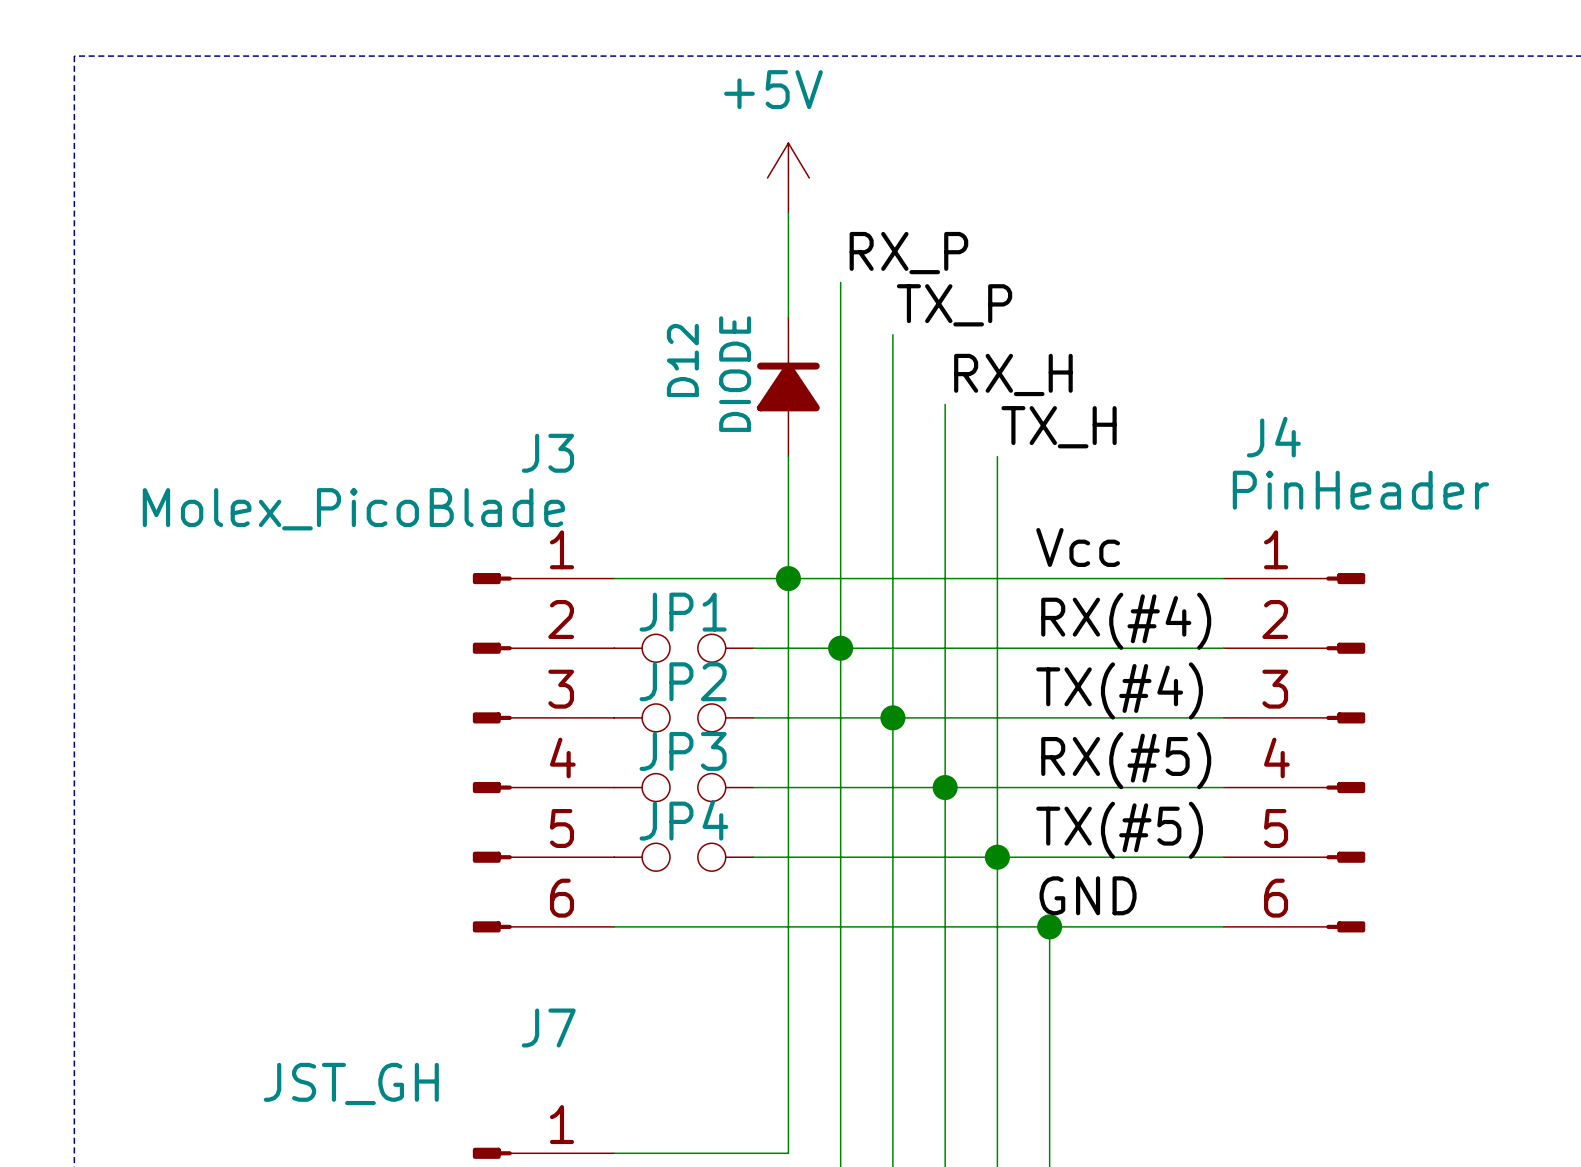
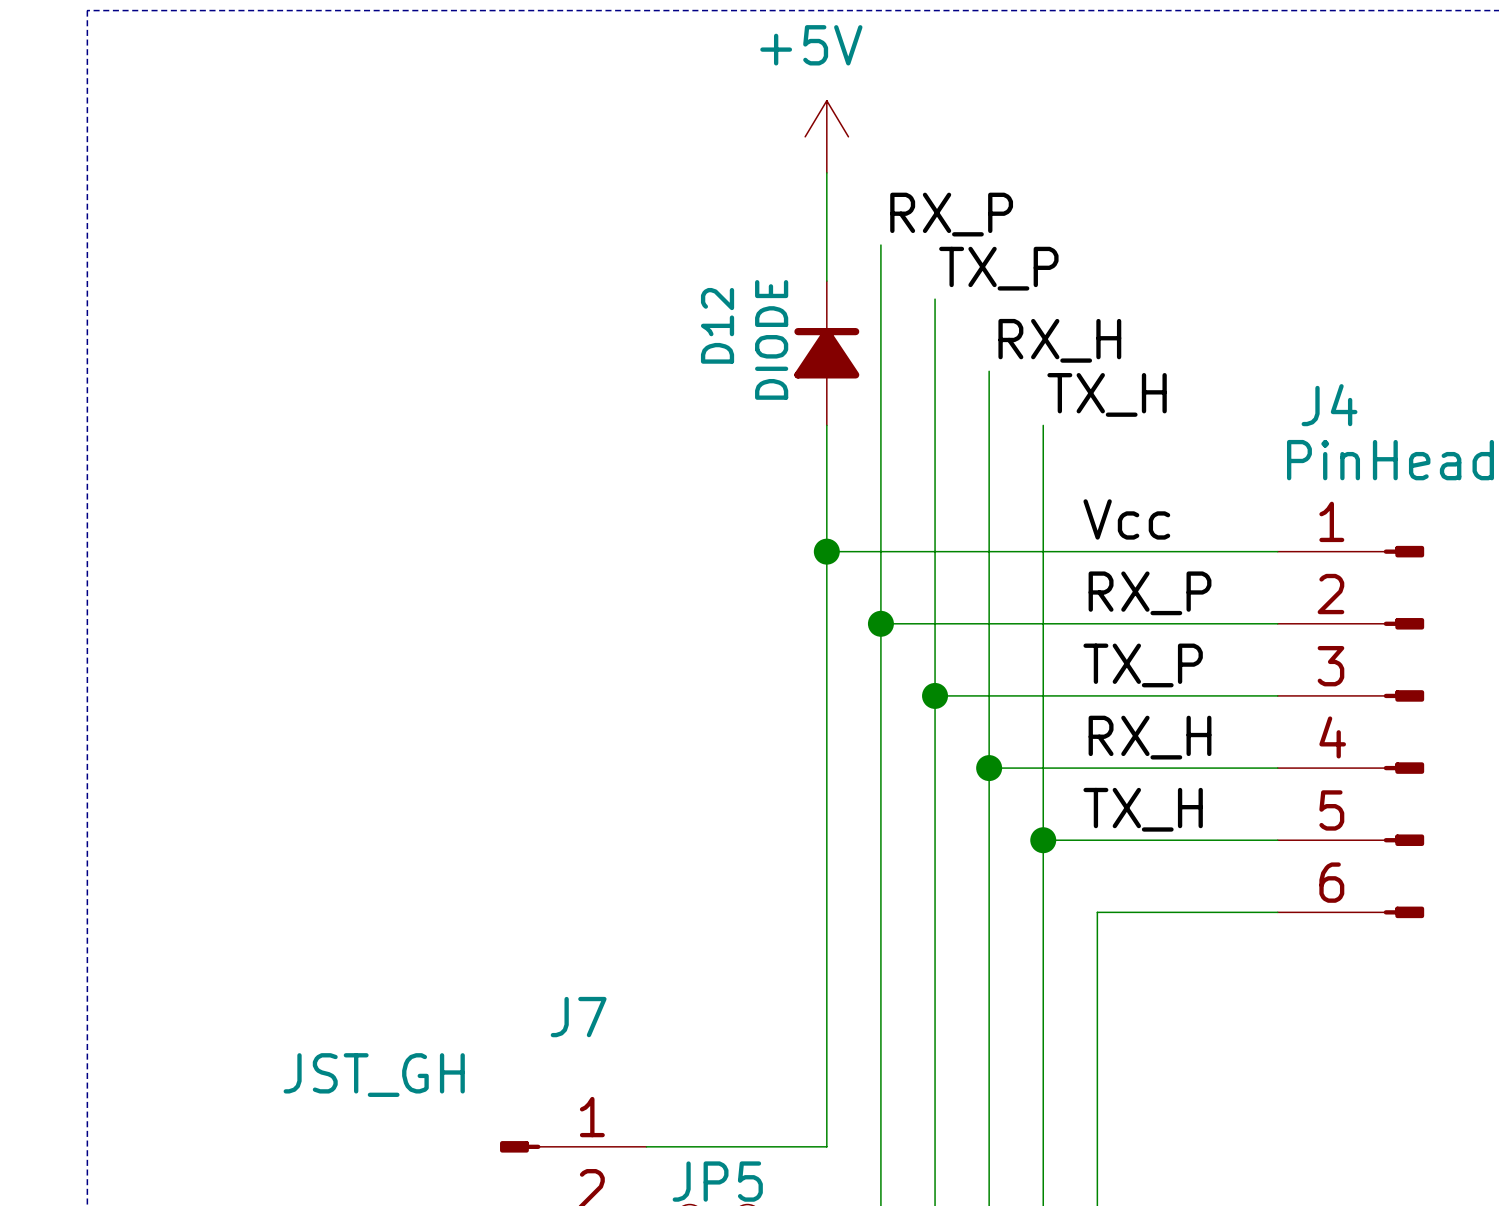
wire: (614, 578) (788, 578) -> none
label: RX(#4) (1126, 621) -> RX_P (1150, 593)
JP1: (683, 648) -> none
wire: (753, 648) (840, 648) -> none
label: TX(#4) (1119, 690) -> TX_P (1143, 665)
JP2: (683, 717) -> none
wire: (753, 717) (892, 717) -> none
J3: Molex_PicoBlade (543, 752) -> none
label: RX(#5) (1126, 760) -> RX_H (1150, 737)
JP3: (683, 787) -> none
wire: (753, 787) (945, 787) -> none
label: TX(#5) (1119, 830) -> TX_H (1143, 809)
JP4: (683, 857) -> none
wire: (753, 857) (997, 857) -> none
label: GND (1088, 895) -> none
wire: (614, 926) (1049, 926) -> none
junction: (1049, 926) -> none

